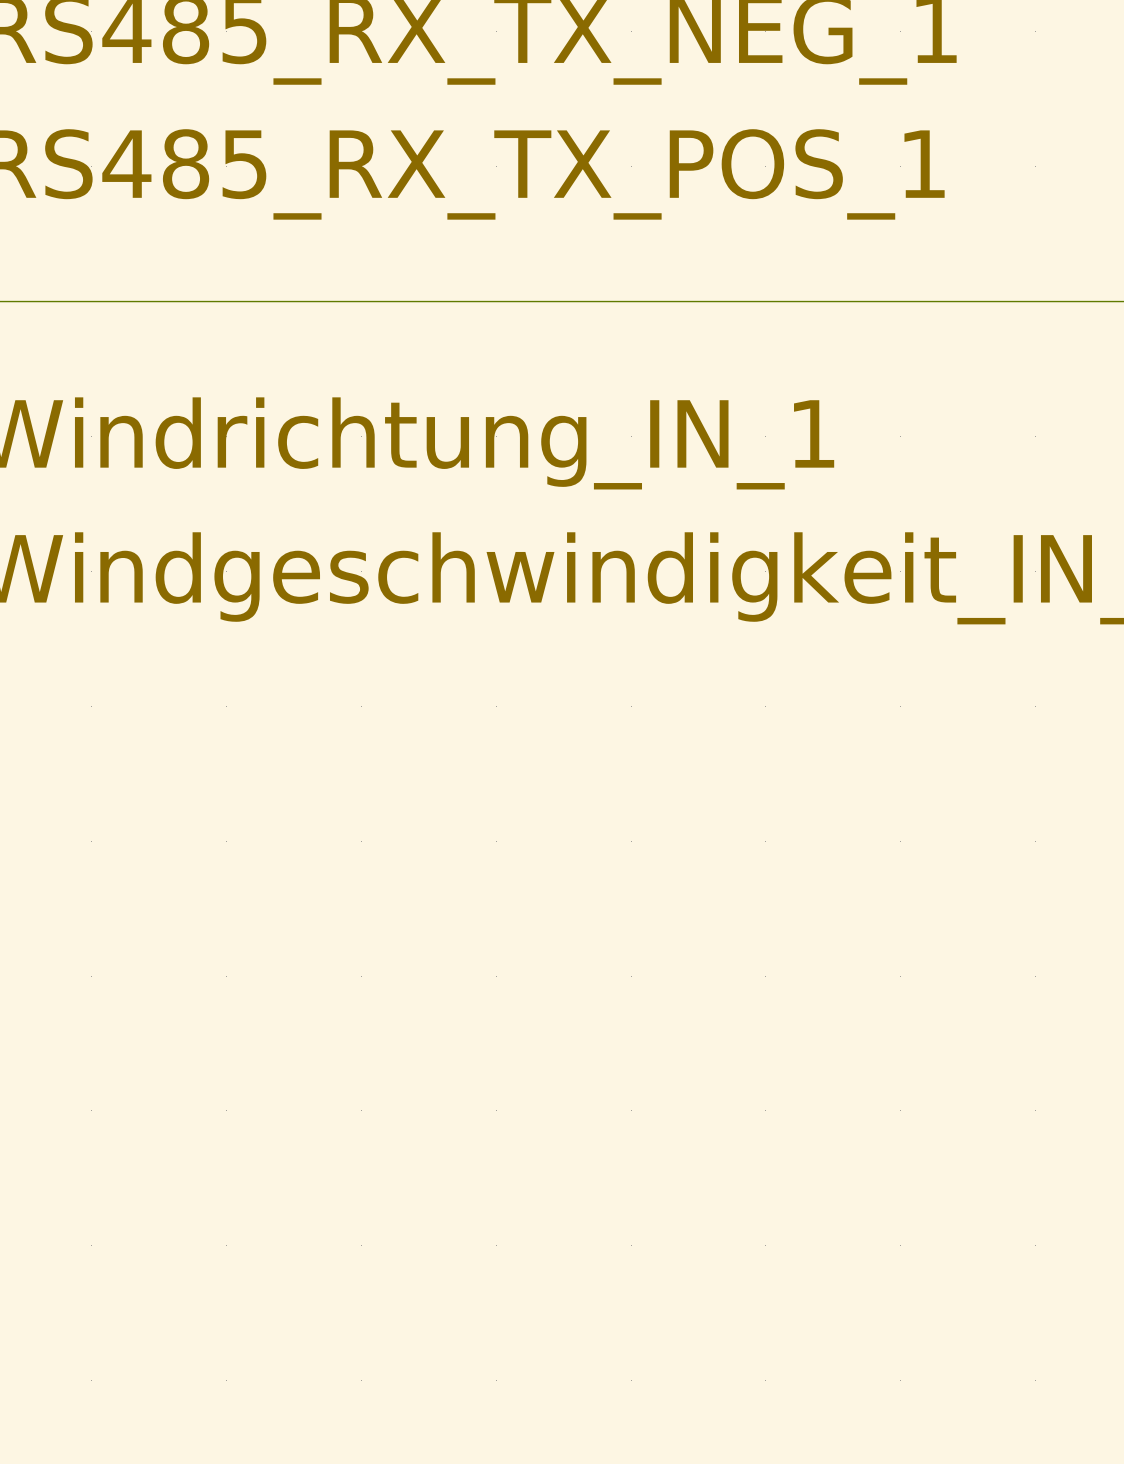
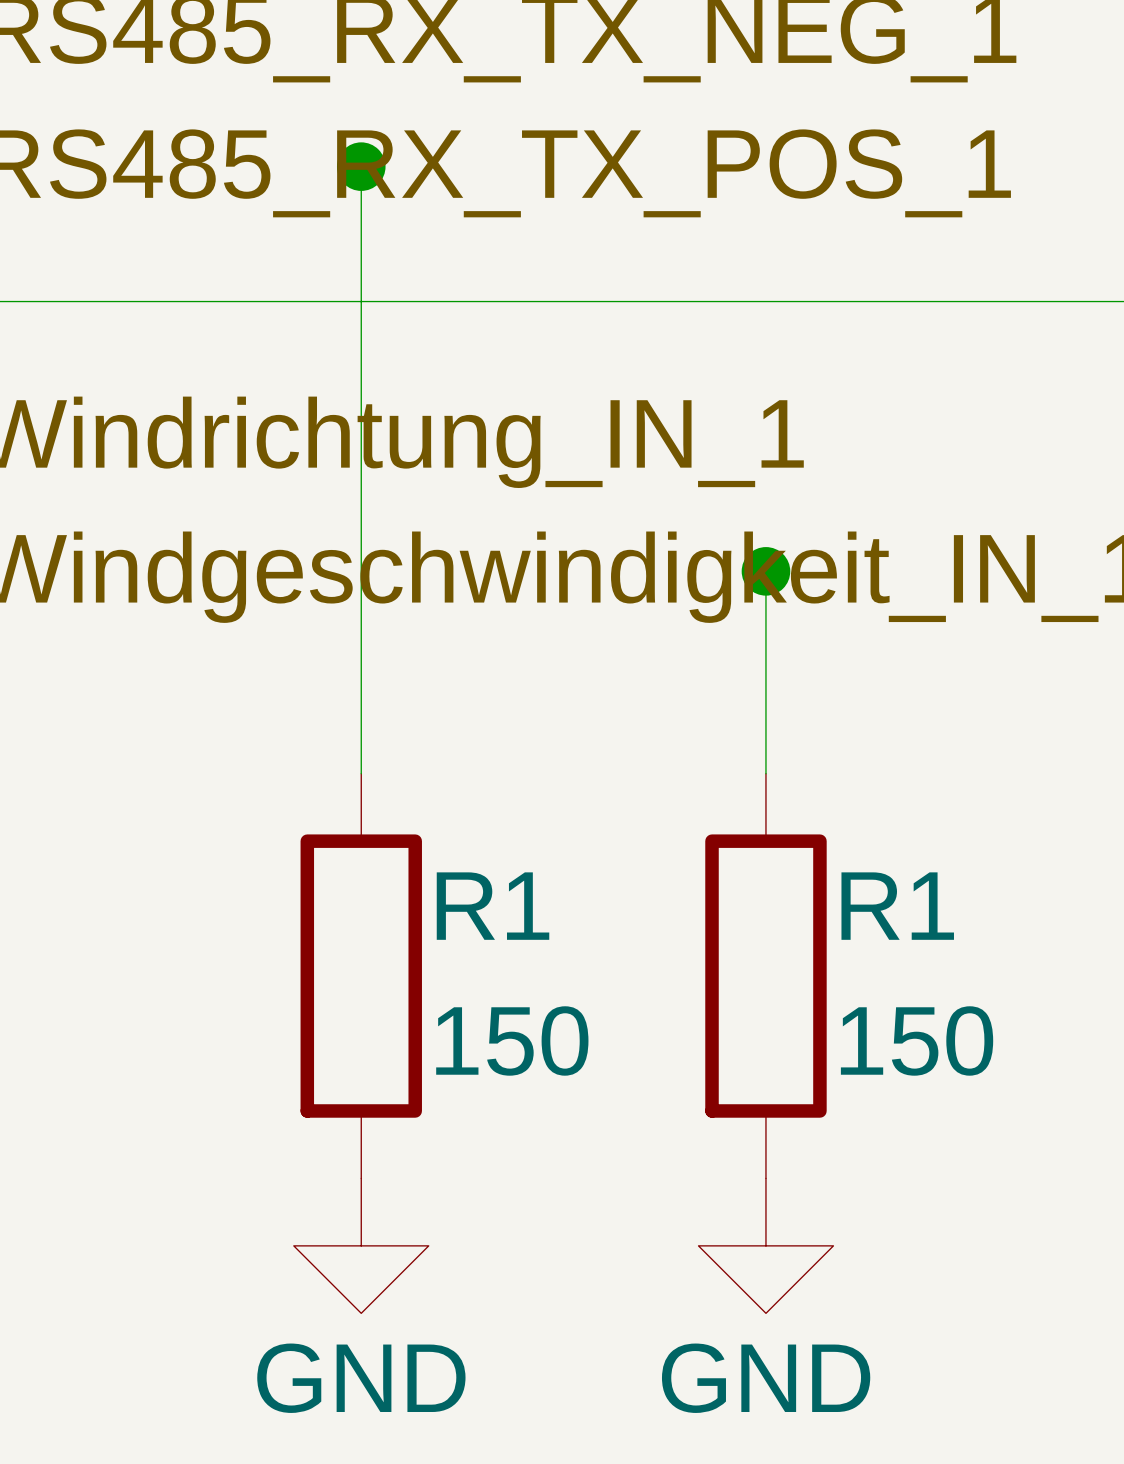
wire: none -> (361, 166) (361, 773)
junction: none -> (361, 166)
wire: none -> (765, 571) (765, 773)
junction: none -> (765, 571)
R1: none -> 150 (361, 976)
R1: none -> 150 (765, 976)
power symbol: none -> GND (361, 1245)
power symbol: none -> GND (765, 1245)

